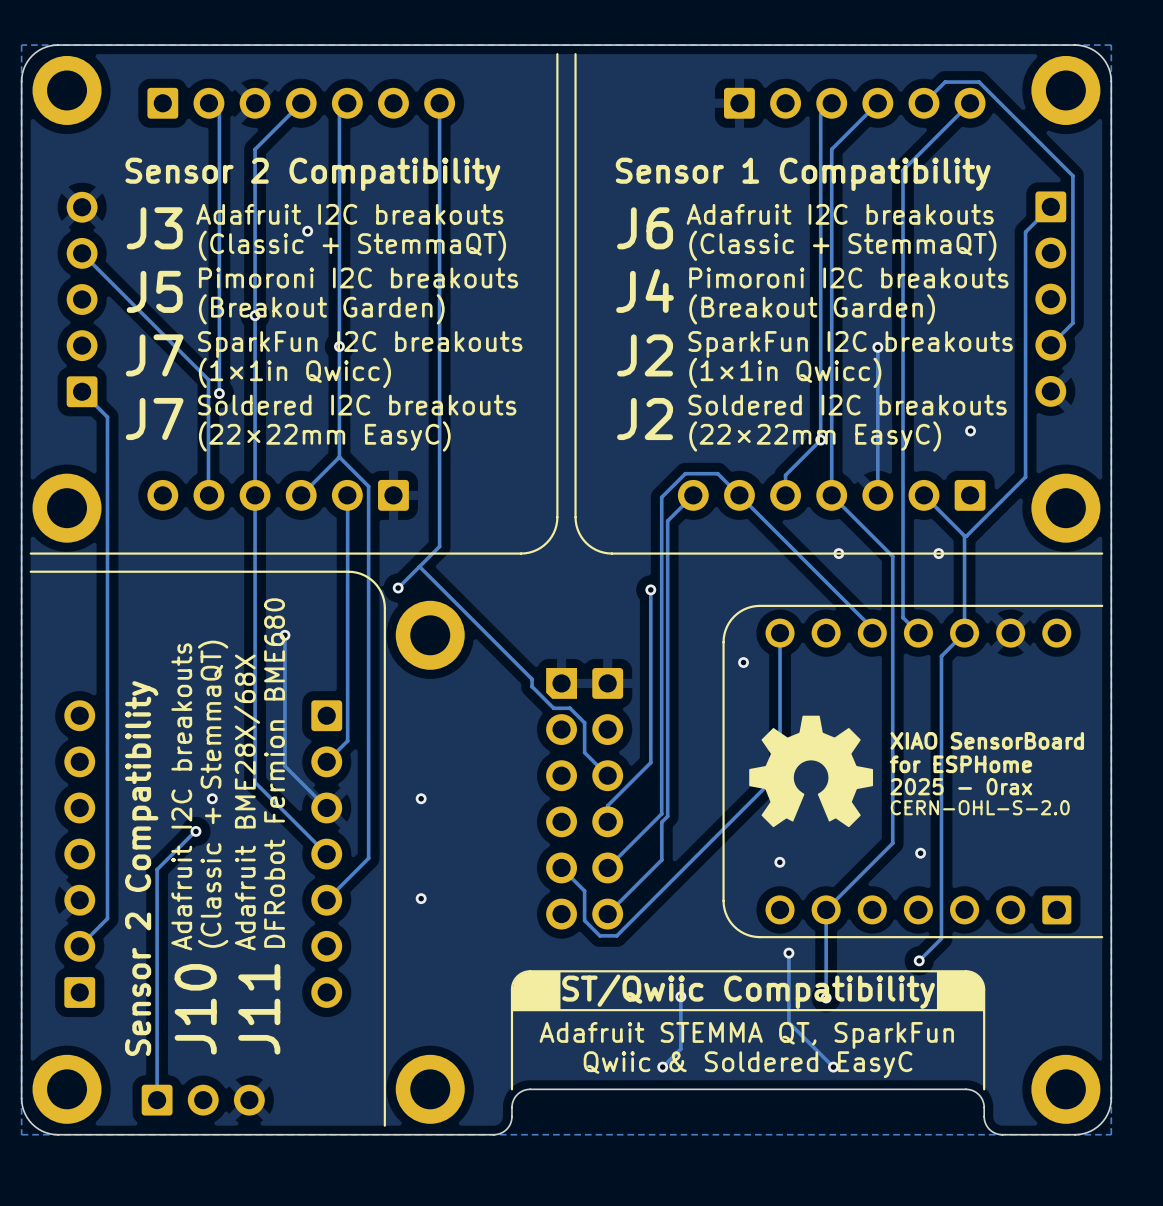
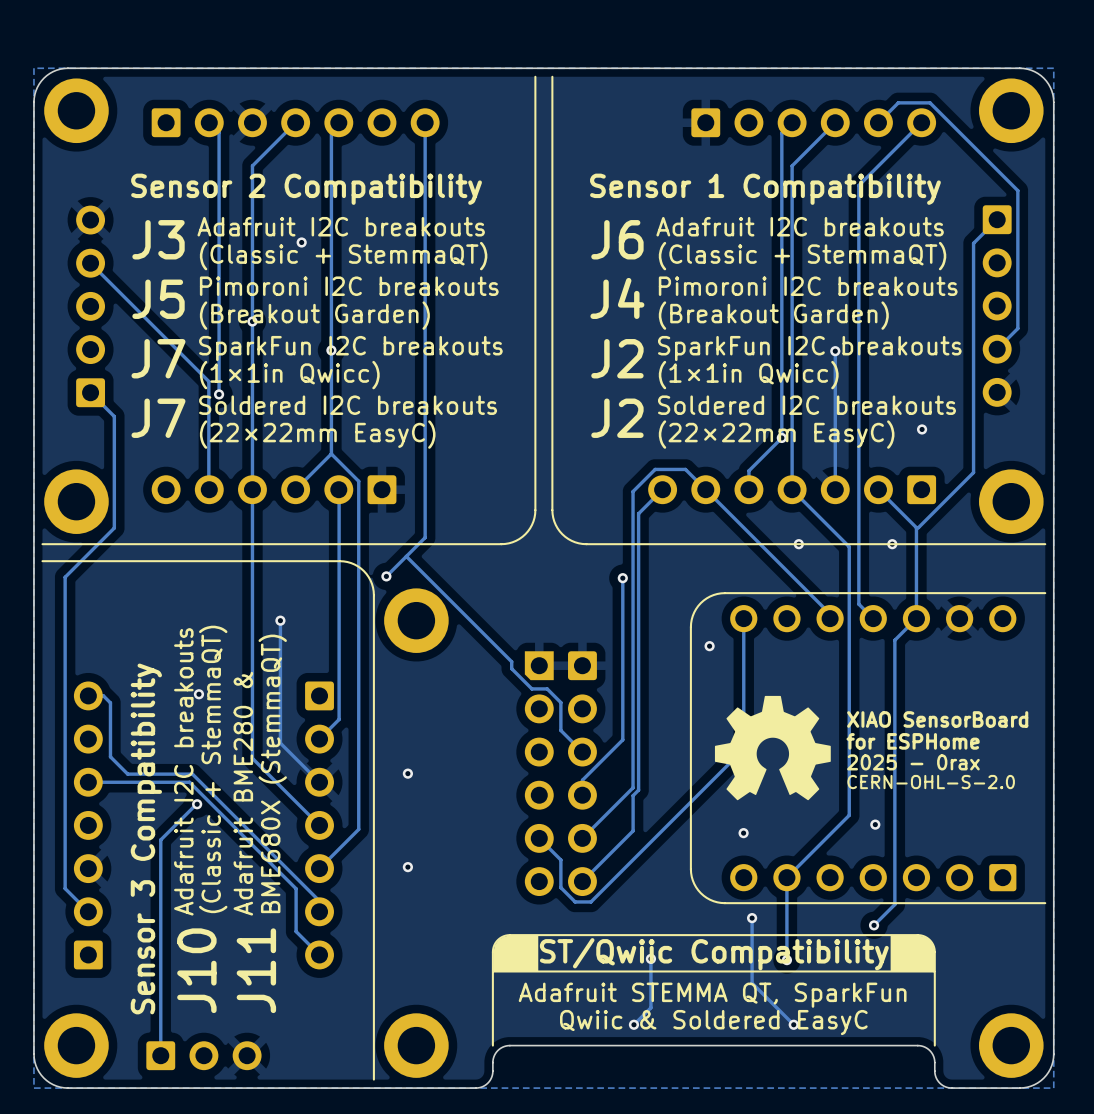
track: (107, 536) (107, 918) (79, 946) -> (114, 528) (65, 577) (65, 888) (88, 911)
track: none -> (88, 695) (103, 695) (110, 702) (110, 756) (127, 774) (192, 774) (319, 901) (319, 911)
text: DFRobot Fermion BME680 (274, 773) -> BME680X (StemmaQT) (272, 773)
via position: (212, 798) -> (198, 694)
text: Adafruit BME28X/68X (247, 802) -> Adafruit BME280 & (243, 793)
track: none -> (88, 782) (189, 782) (296, 888) (296, 931) (319, 954)
text: Sensor 2 Compatibility (141, 868) -> Sensor 3 Compatibility (146, 838)

